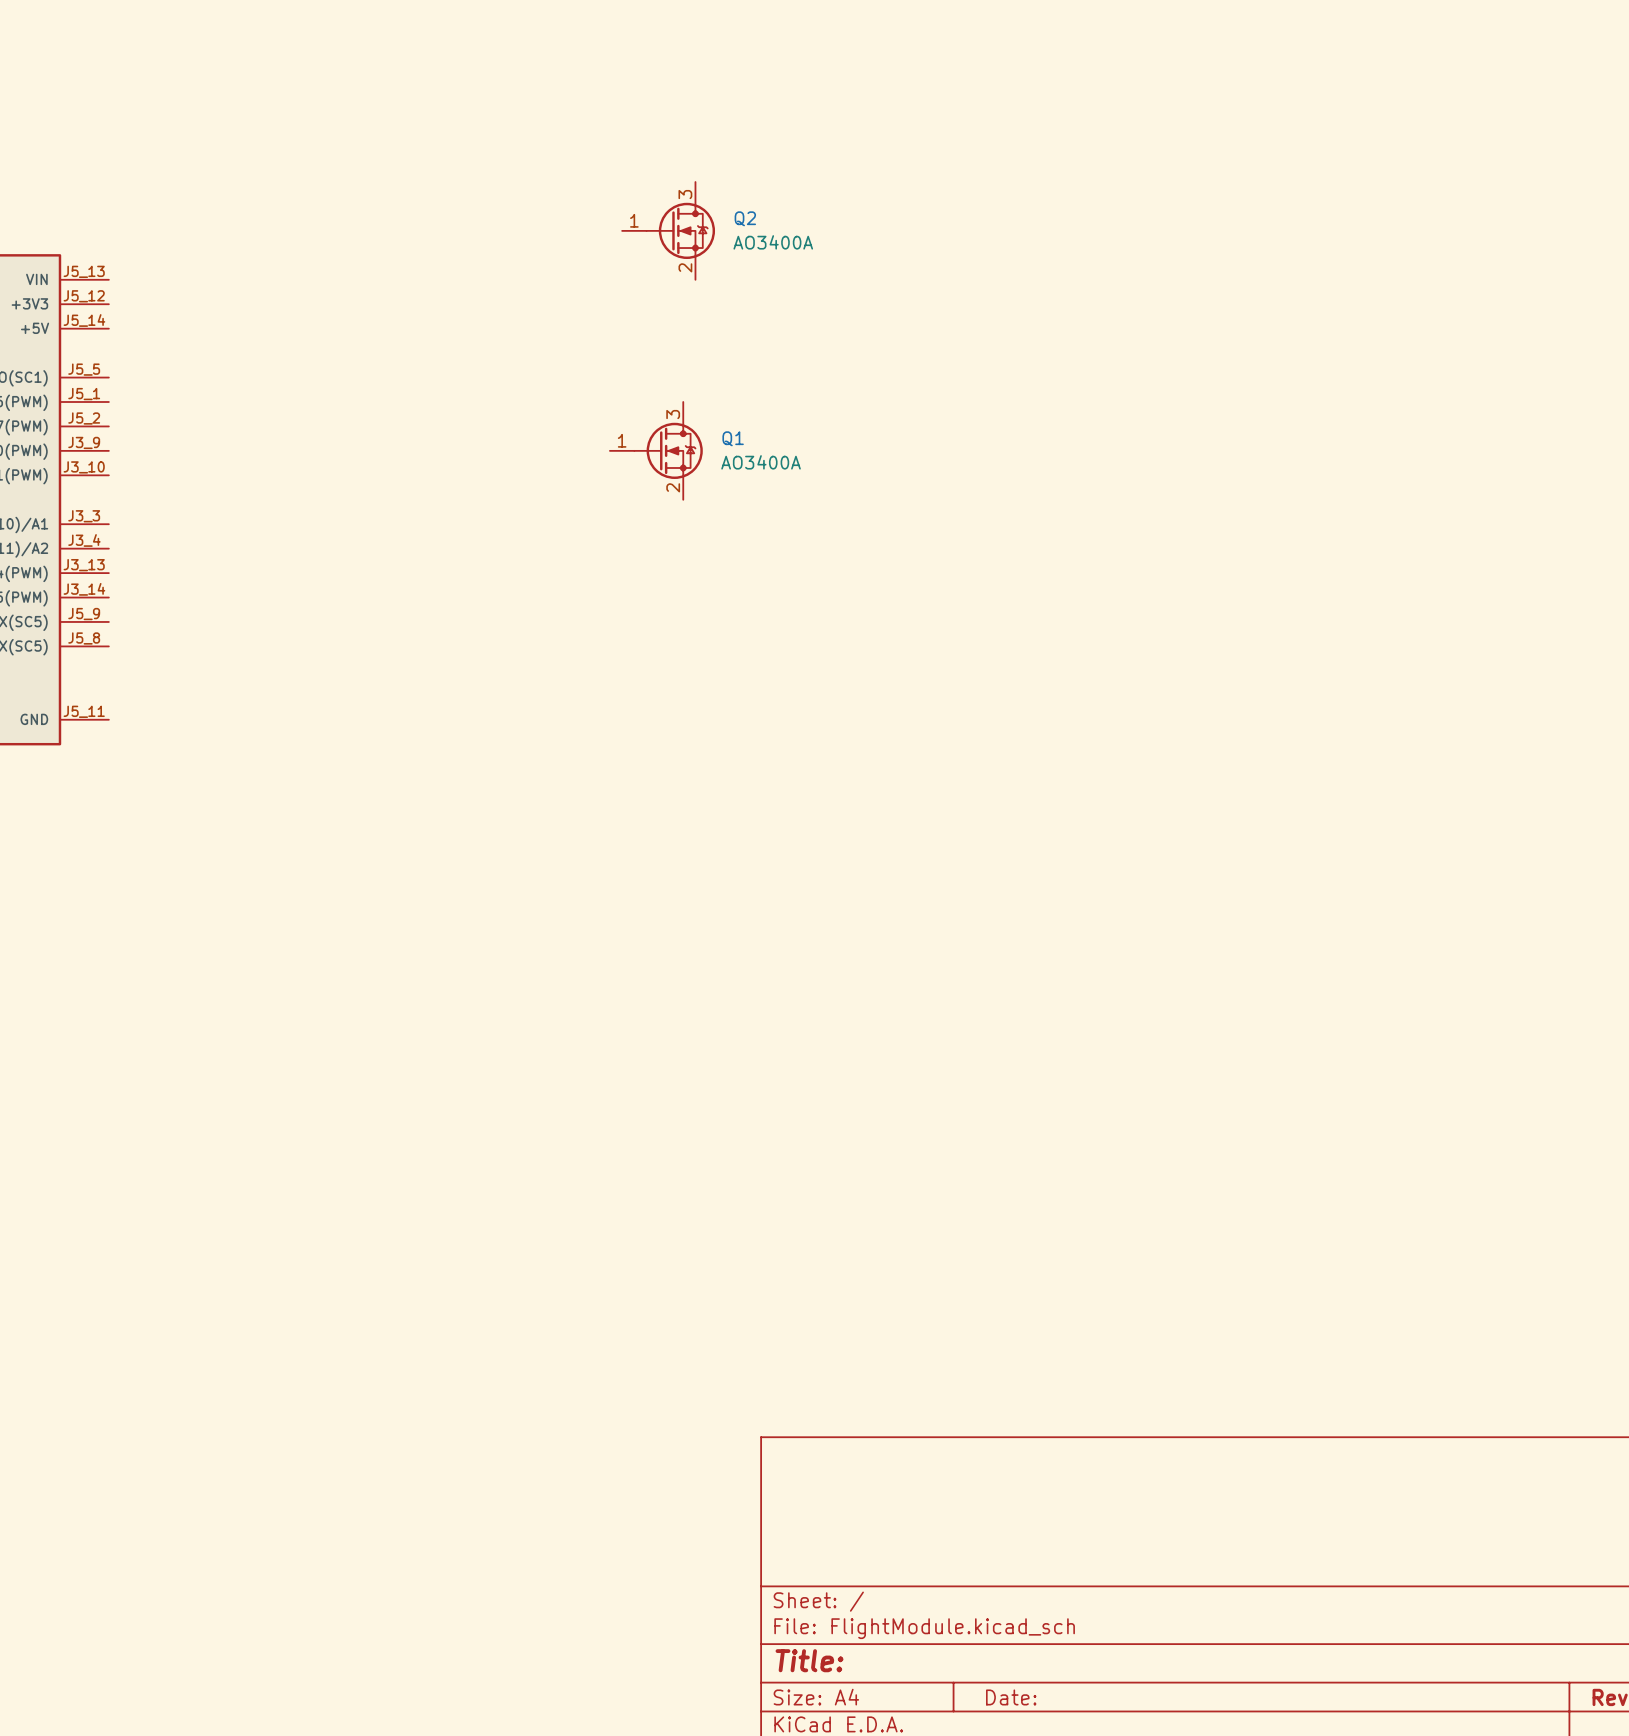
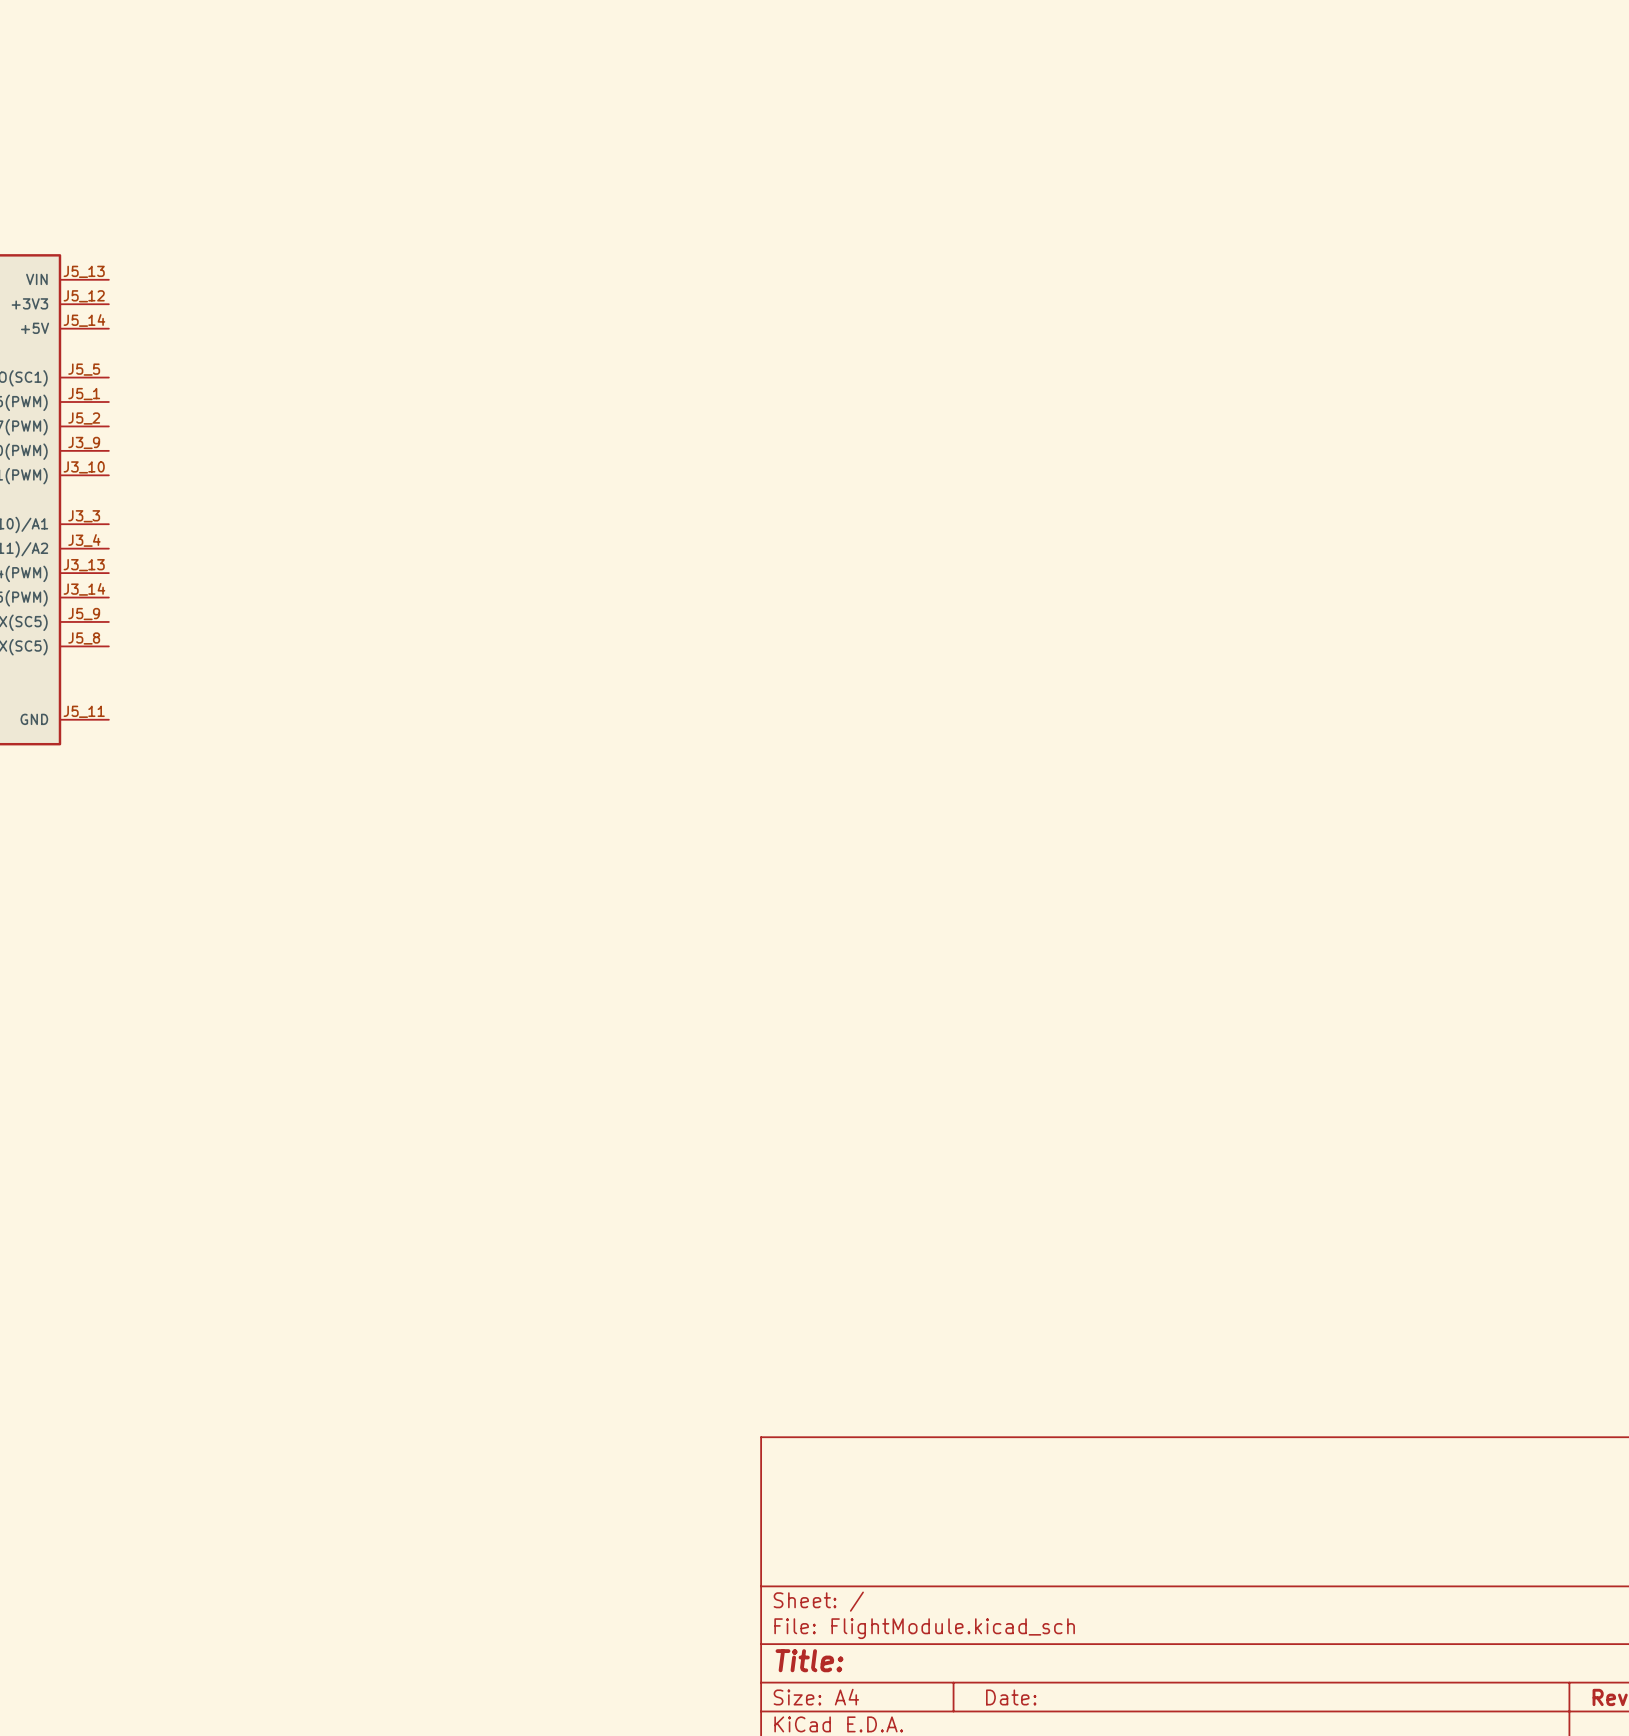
Q2: AO3400A (668, 230) -> none
Q1: AO3400A (656, 450) -> none

